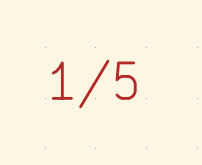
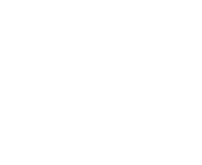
text: 1/5 (94, 84) -> none

